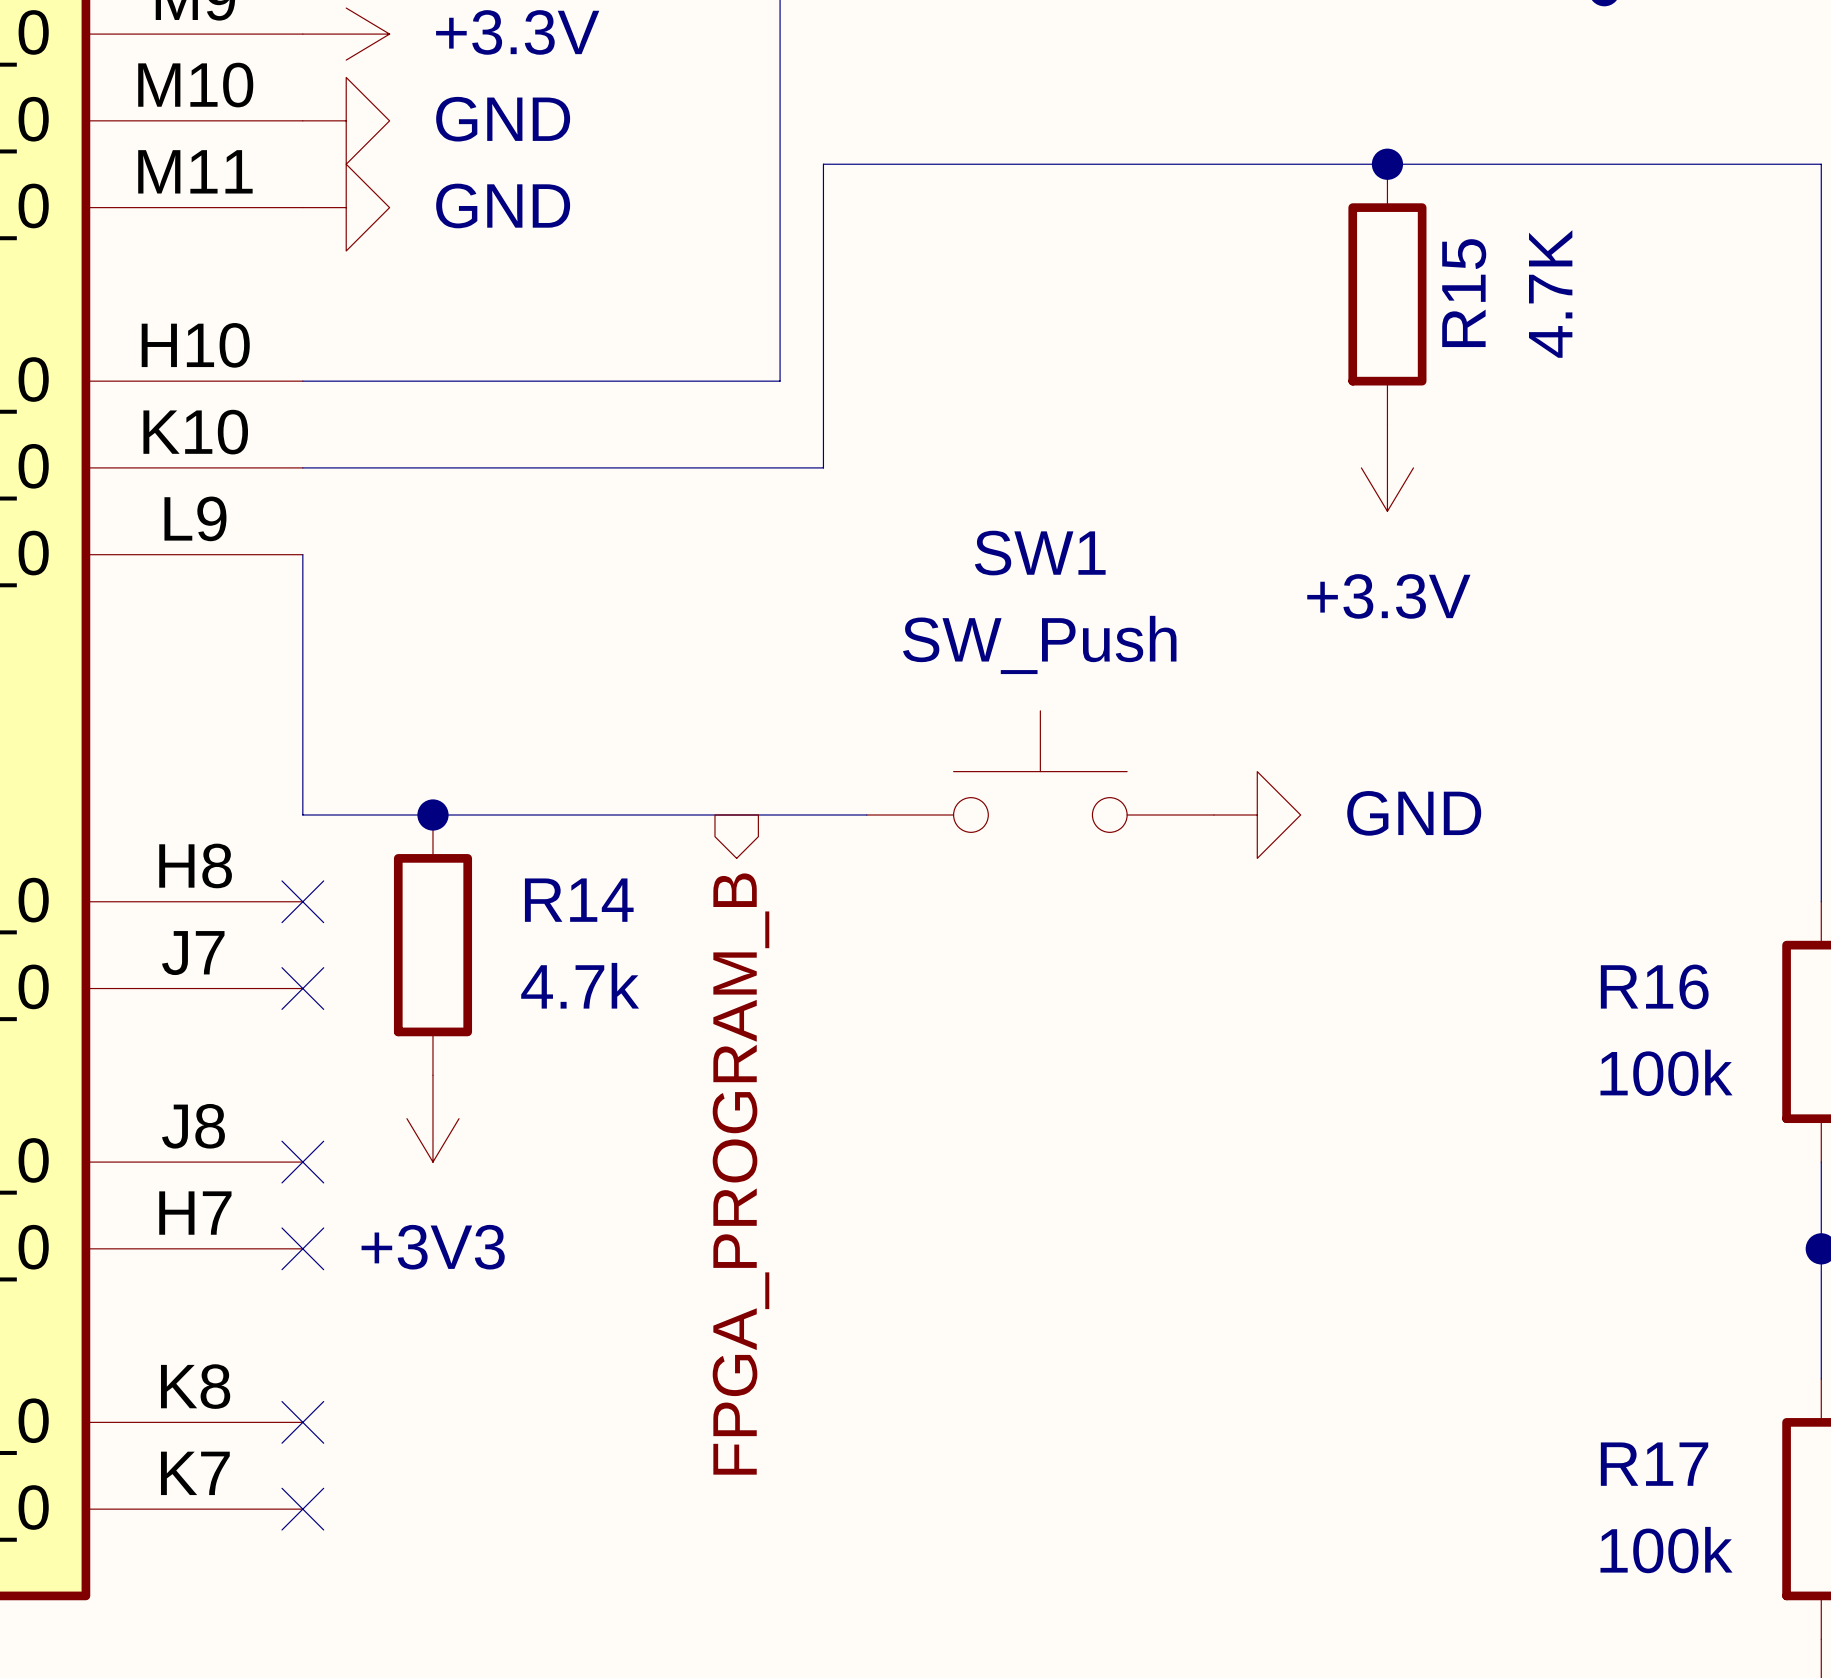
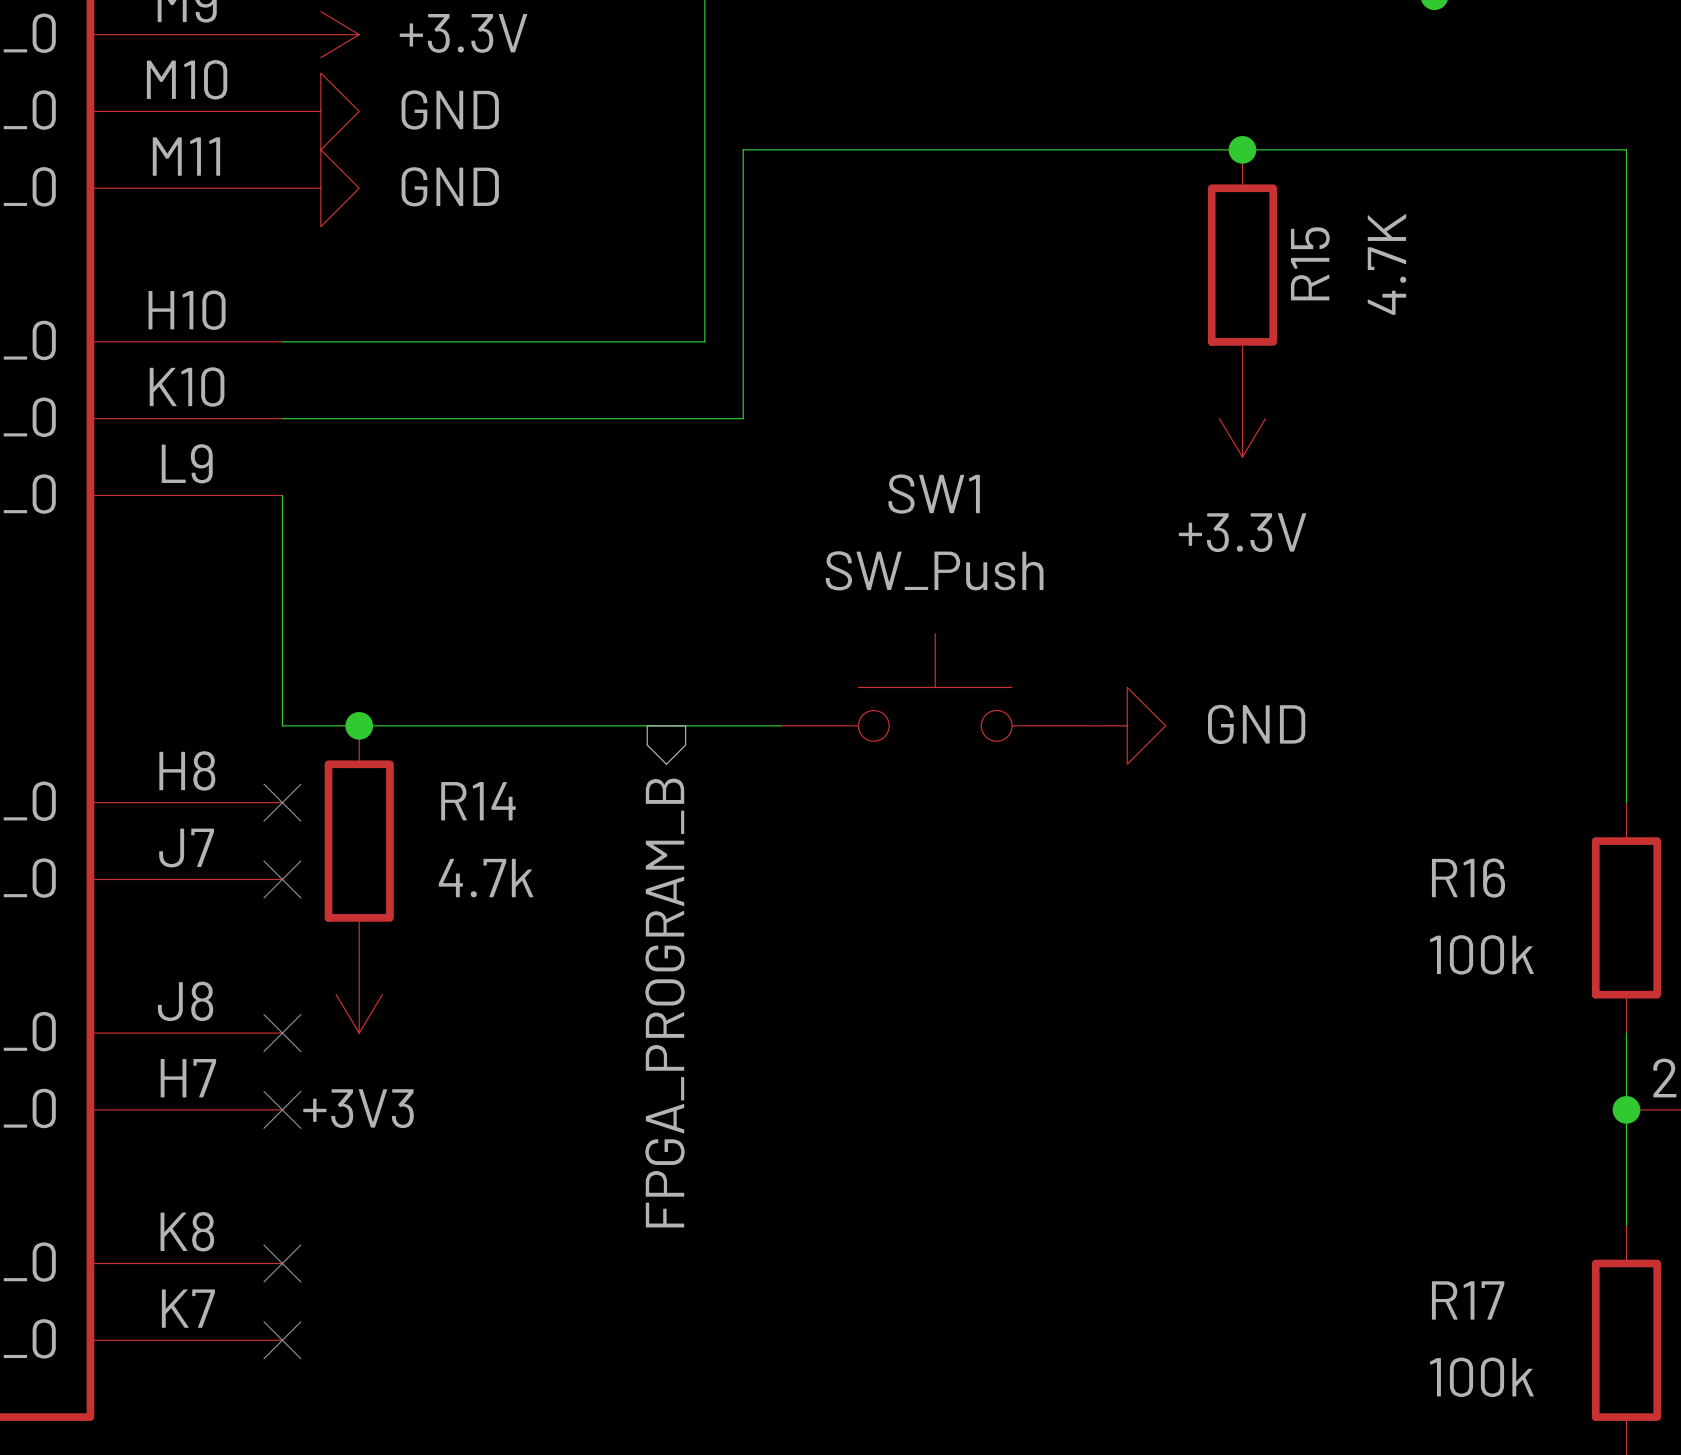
junction position: (432, 815) -> (359, 725)
R14 position: (432, 945) -> (359, 841)
power symbol position: +3V3 (432, 1118) -> +3V3 (359, 994)

